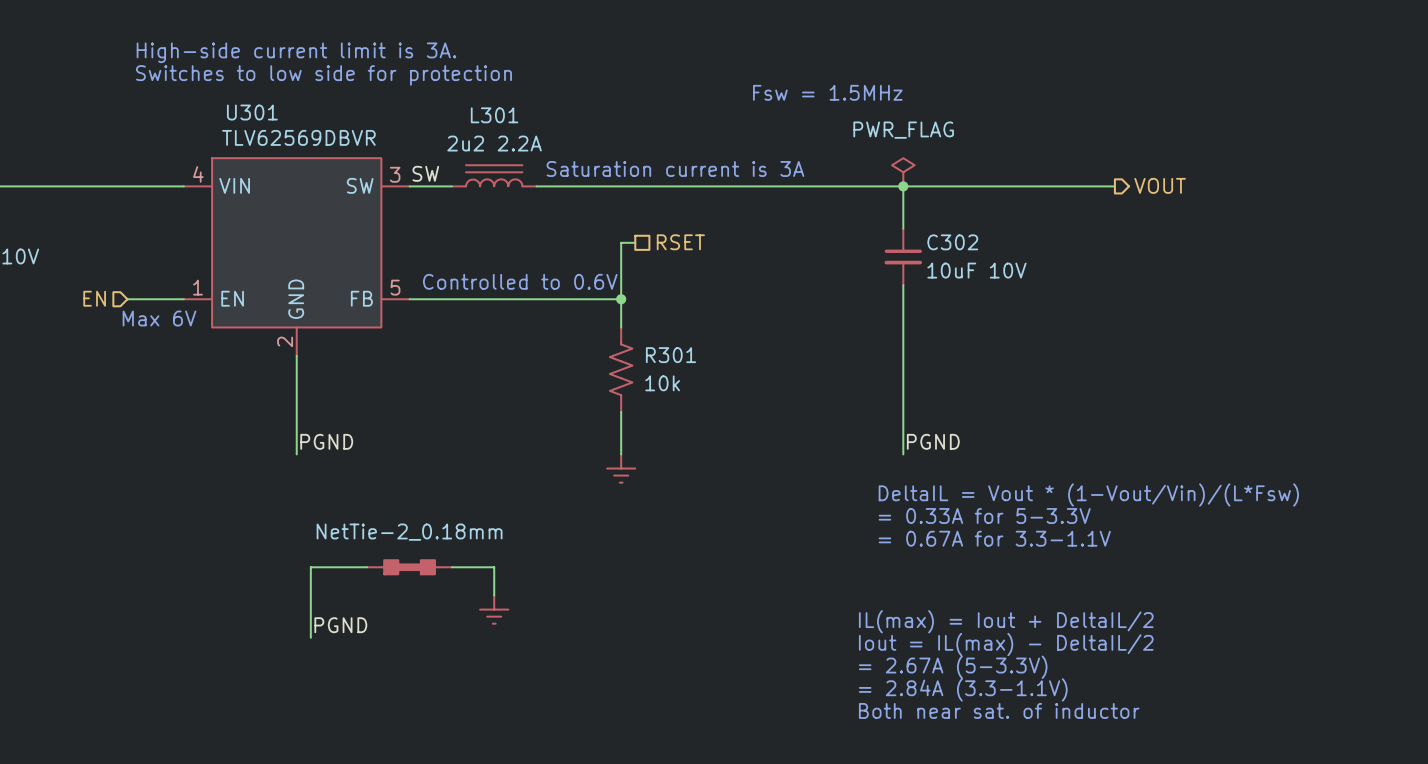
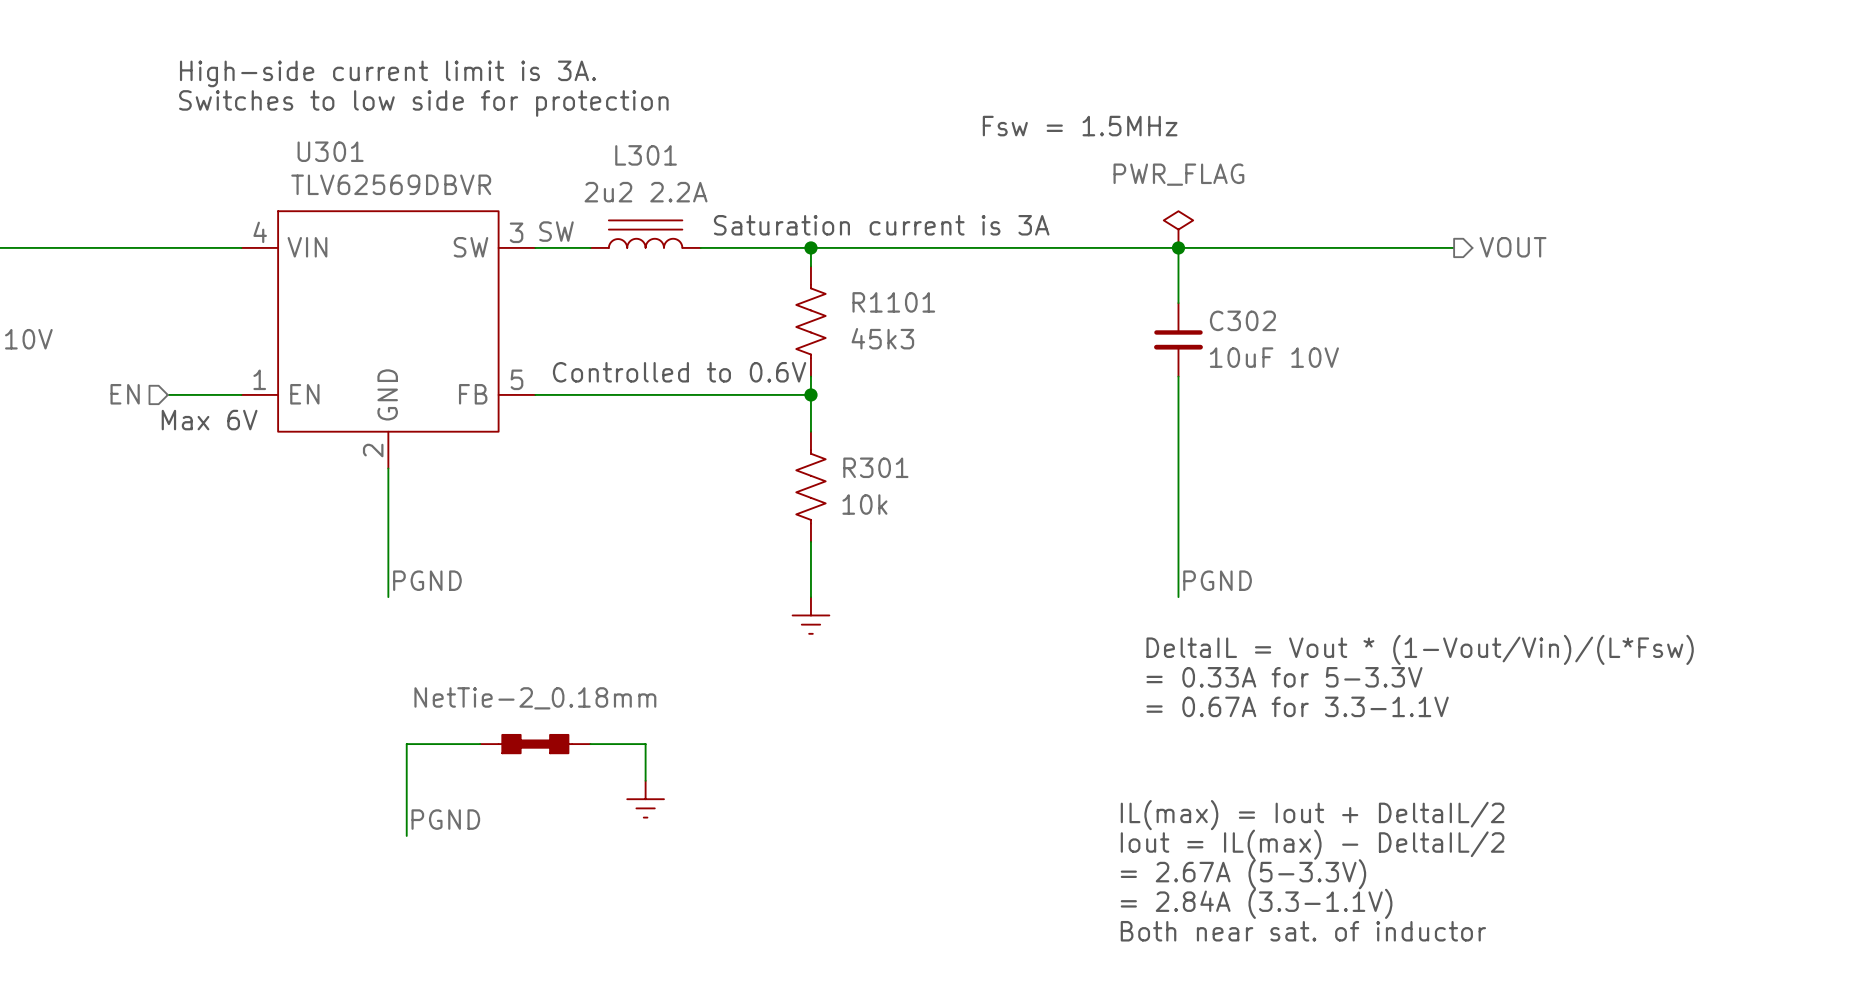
wire: none -> (810, 247) (810, 266)
junction: none -> (810, 247)
R1101: none -> 45k3 (810, 321)
wire: (635, 242) (621, 242) (621, 285) -> none
hierarchical label: RSET (680, 242) -> none

